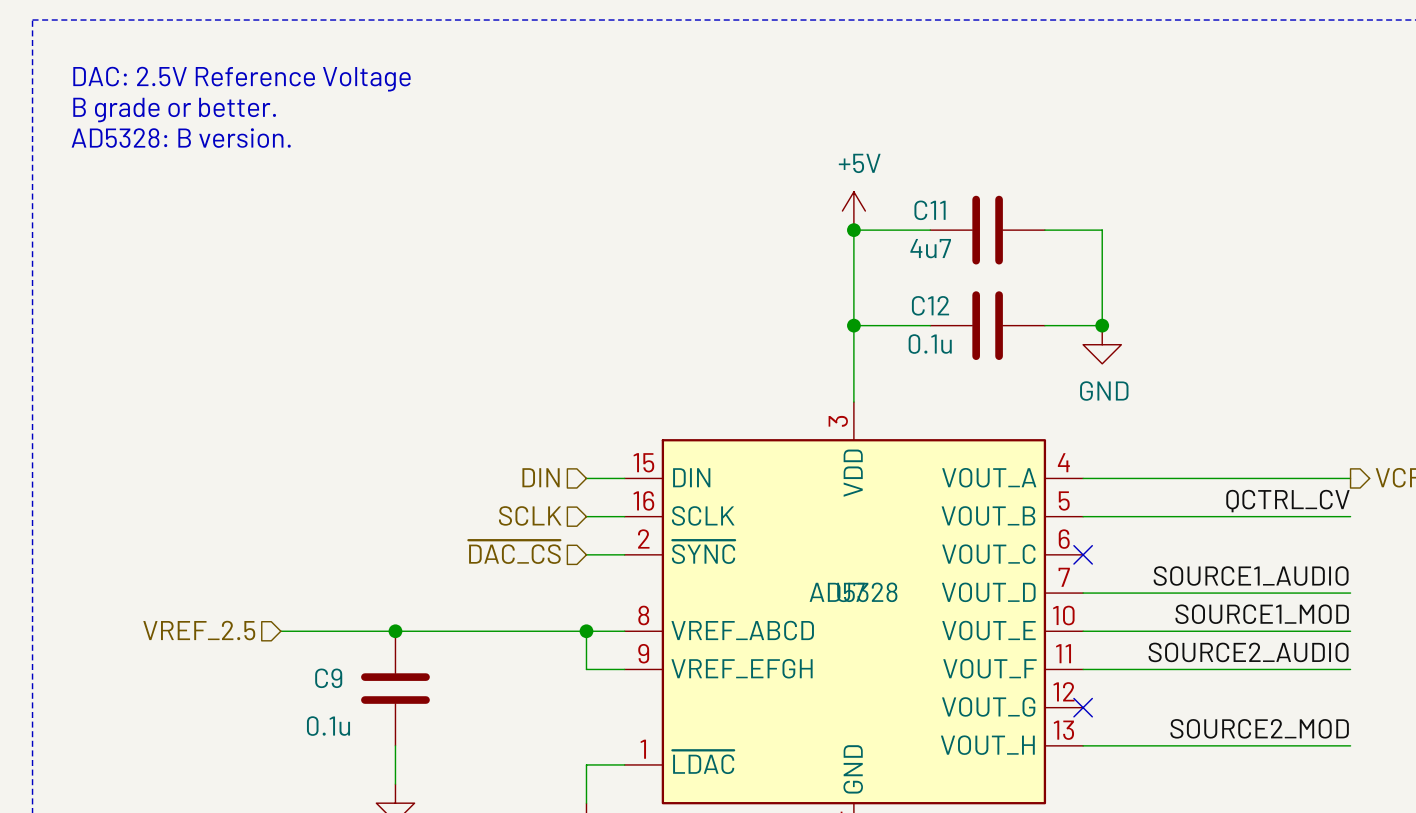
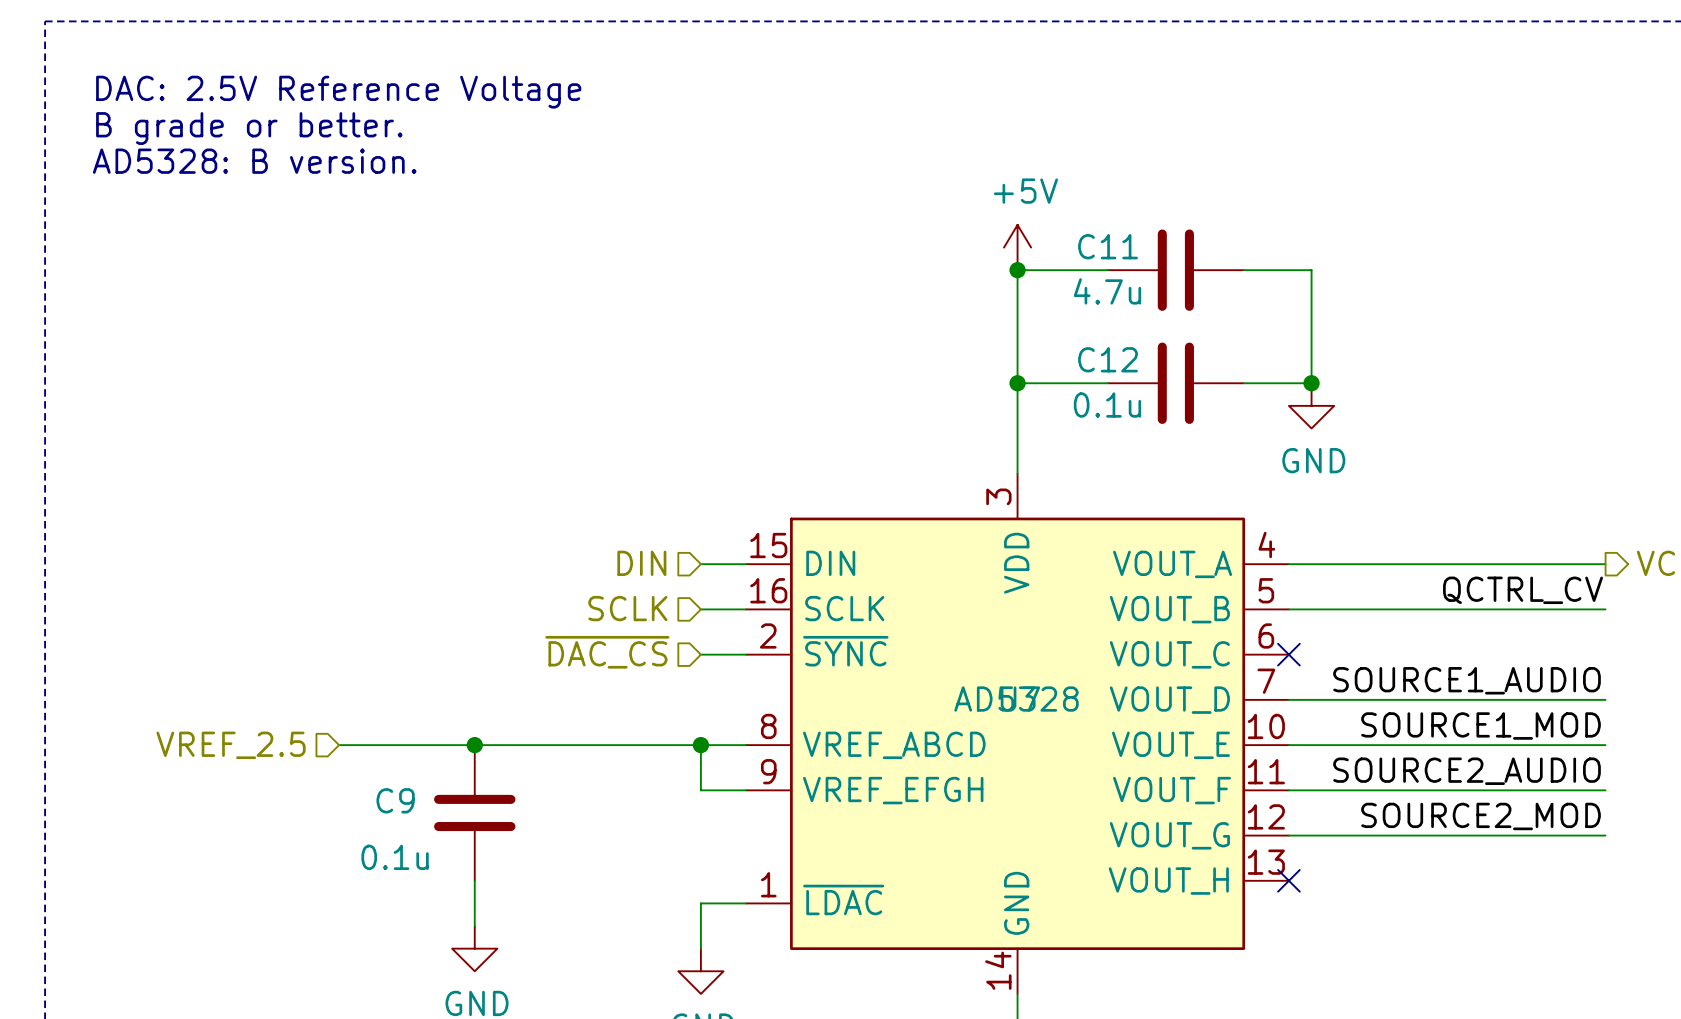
C11 value: 4u7 (930, 248) -> 4.7u (1107, 291)
no-connect mark position: (1083, 707) -> (1288, 880)
label position: SOURCE2_MOD (1259, 728) -> SOURCE2_MOD (1481, 816)
wire: (1083, 745) (1350, 745) -> (1288, 835) (1605, 835)

